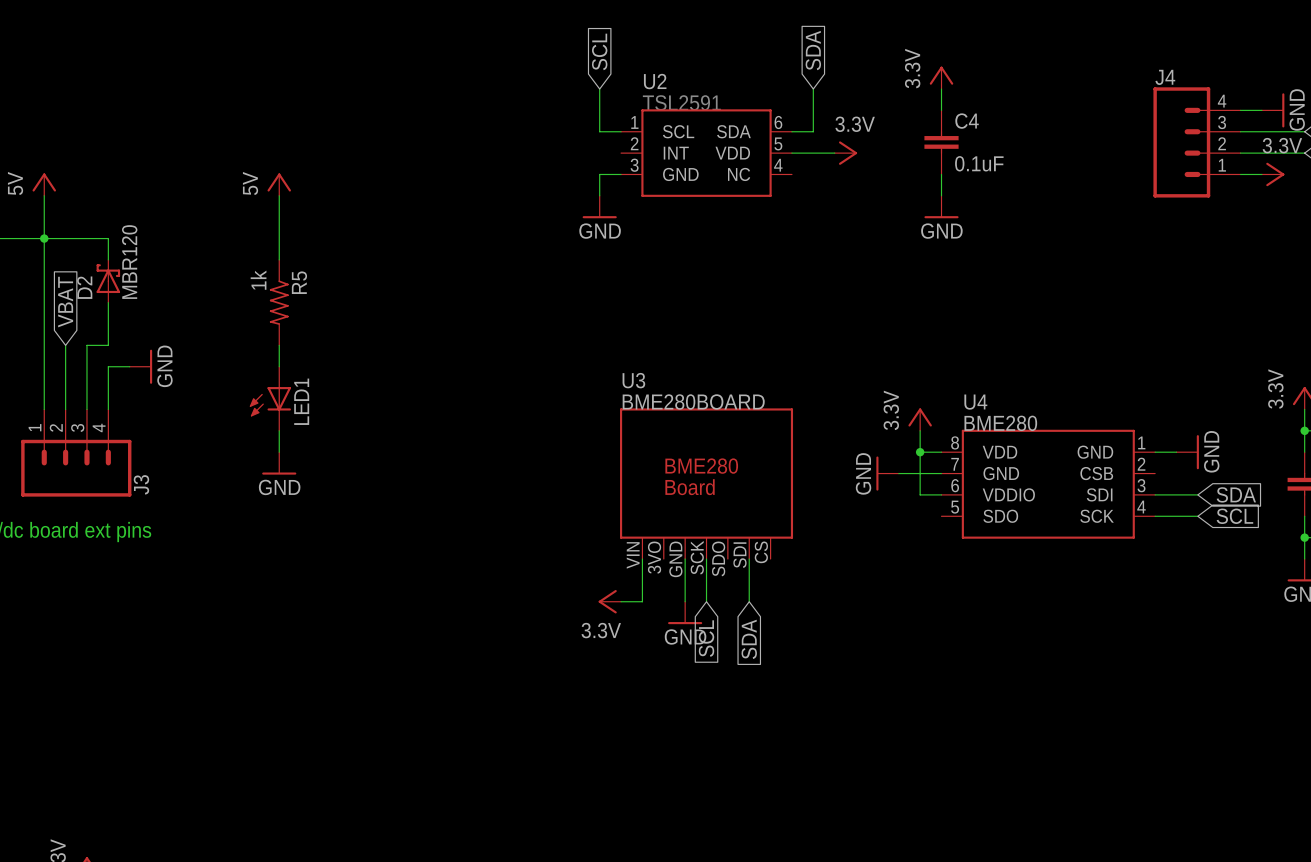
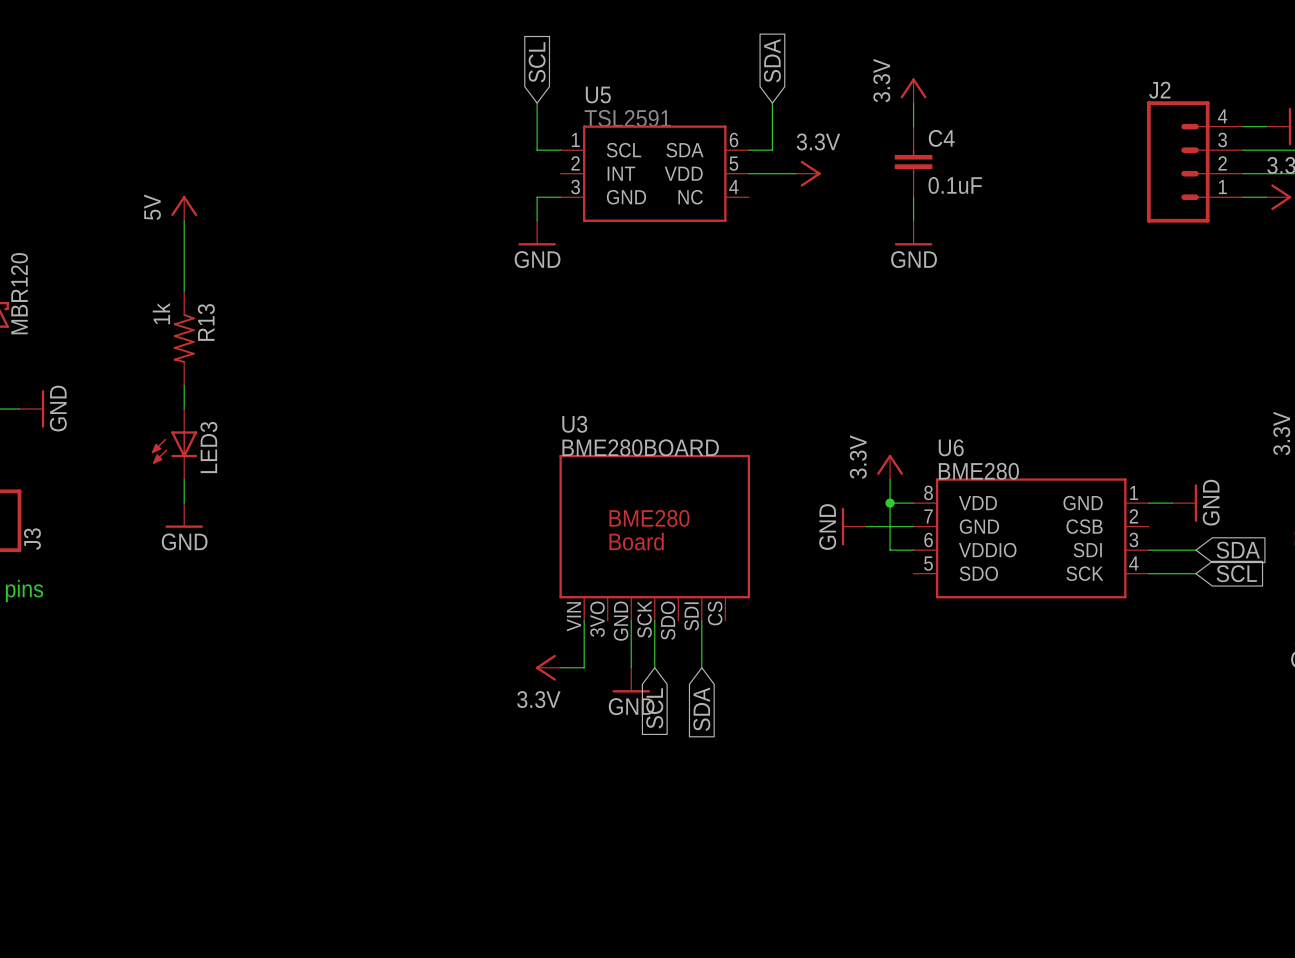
J4 name: J4 (1165, 77) -> J2 (1159, 90)
U2 name: U2 (655, 81) -> U5 (598, 95)
R5 name: R5 (299, 282) -> R13 (206, 322)
LED1 name: LED1 (301, 401) -> LED3 (208, 447)
U4 name: U4 (975, 402) -> U6 (951, 447)

